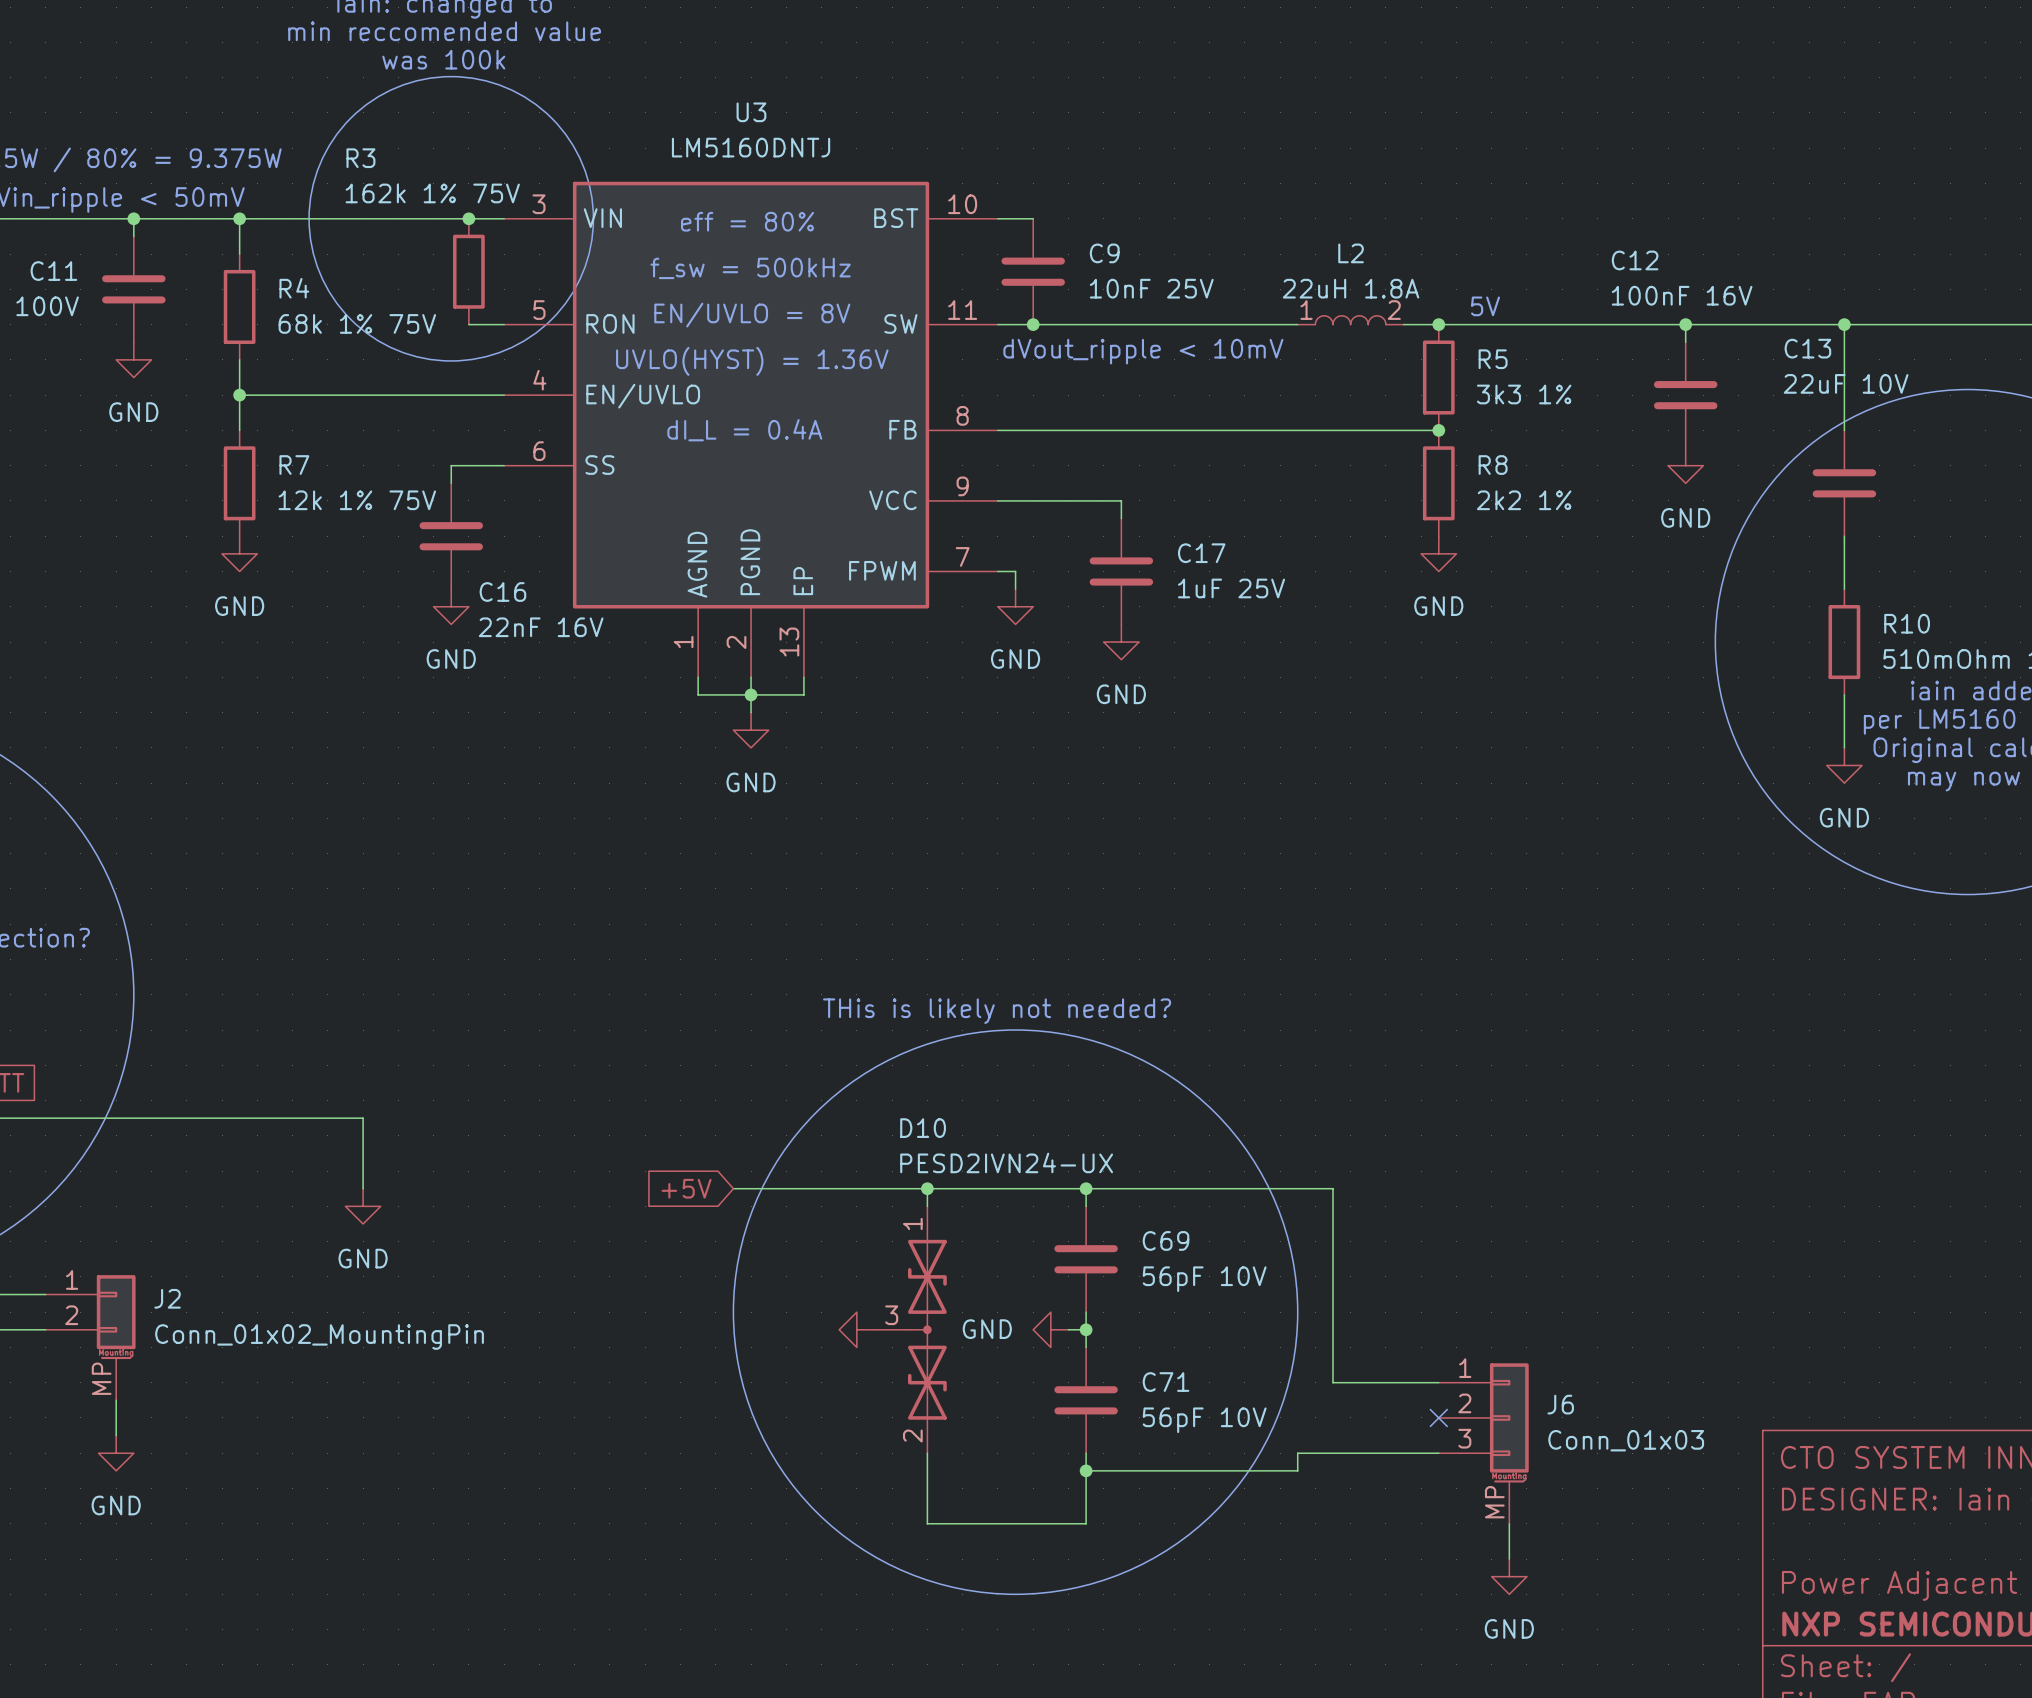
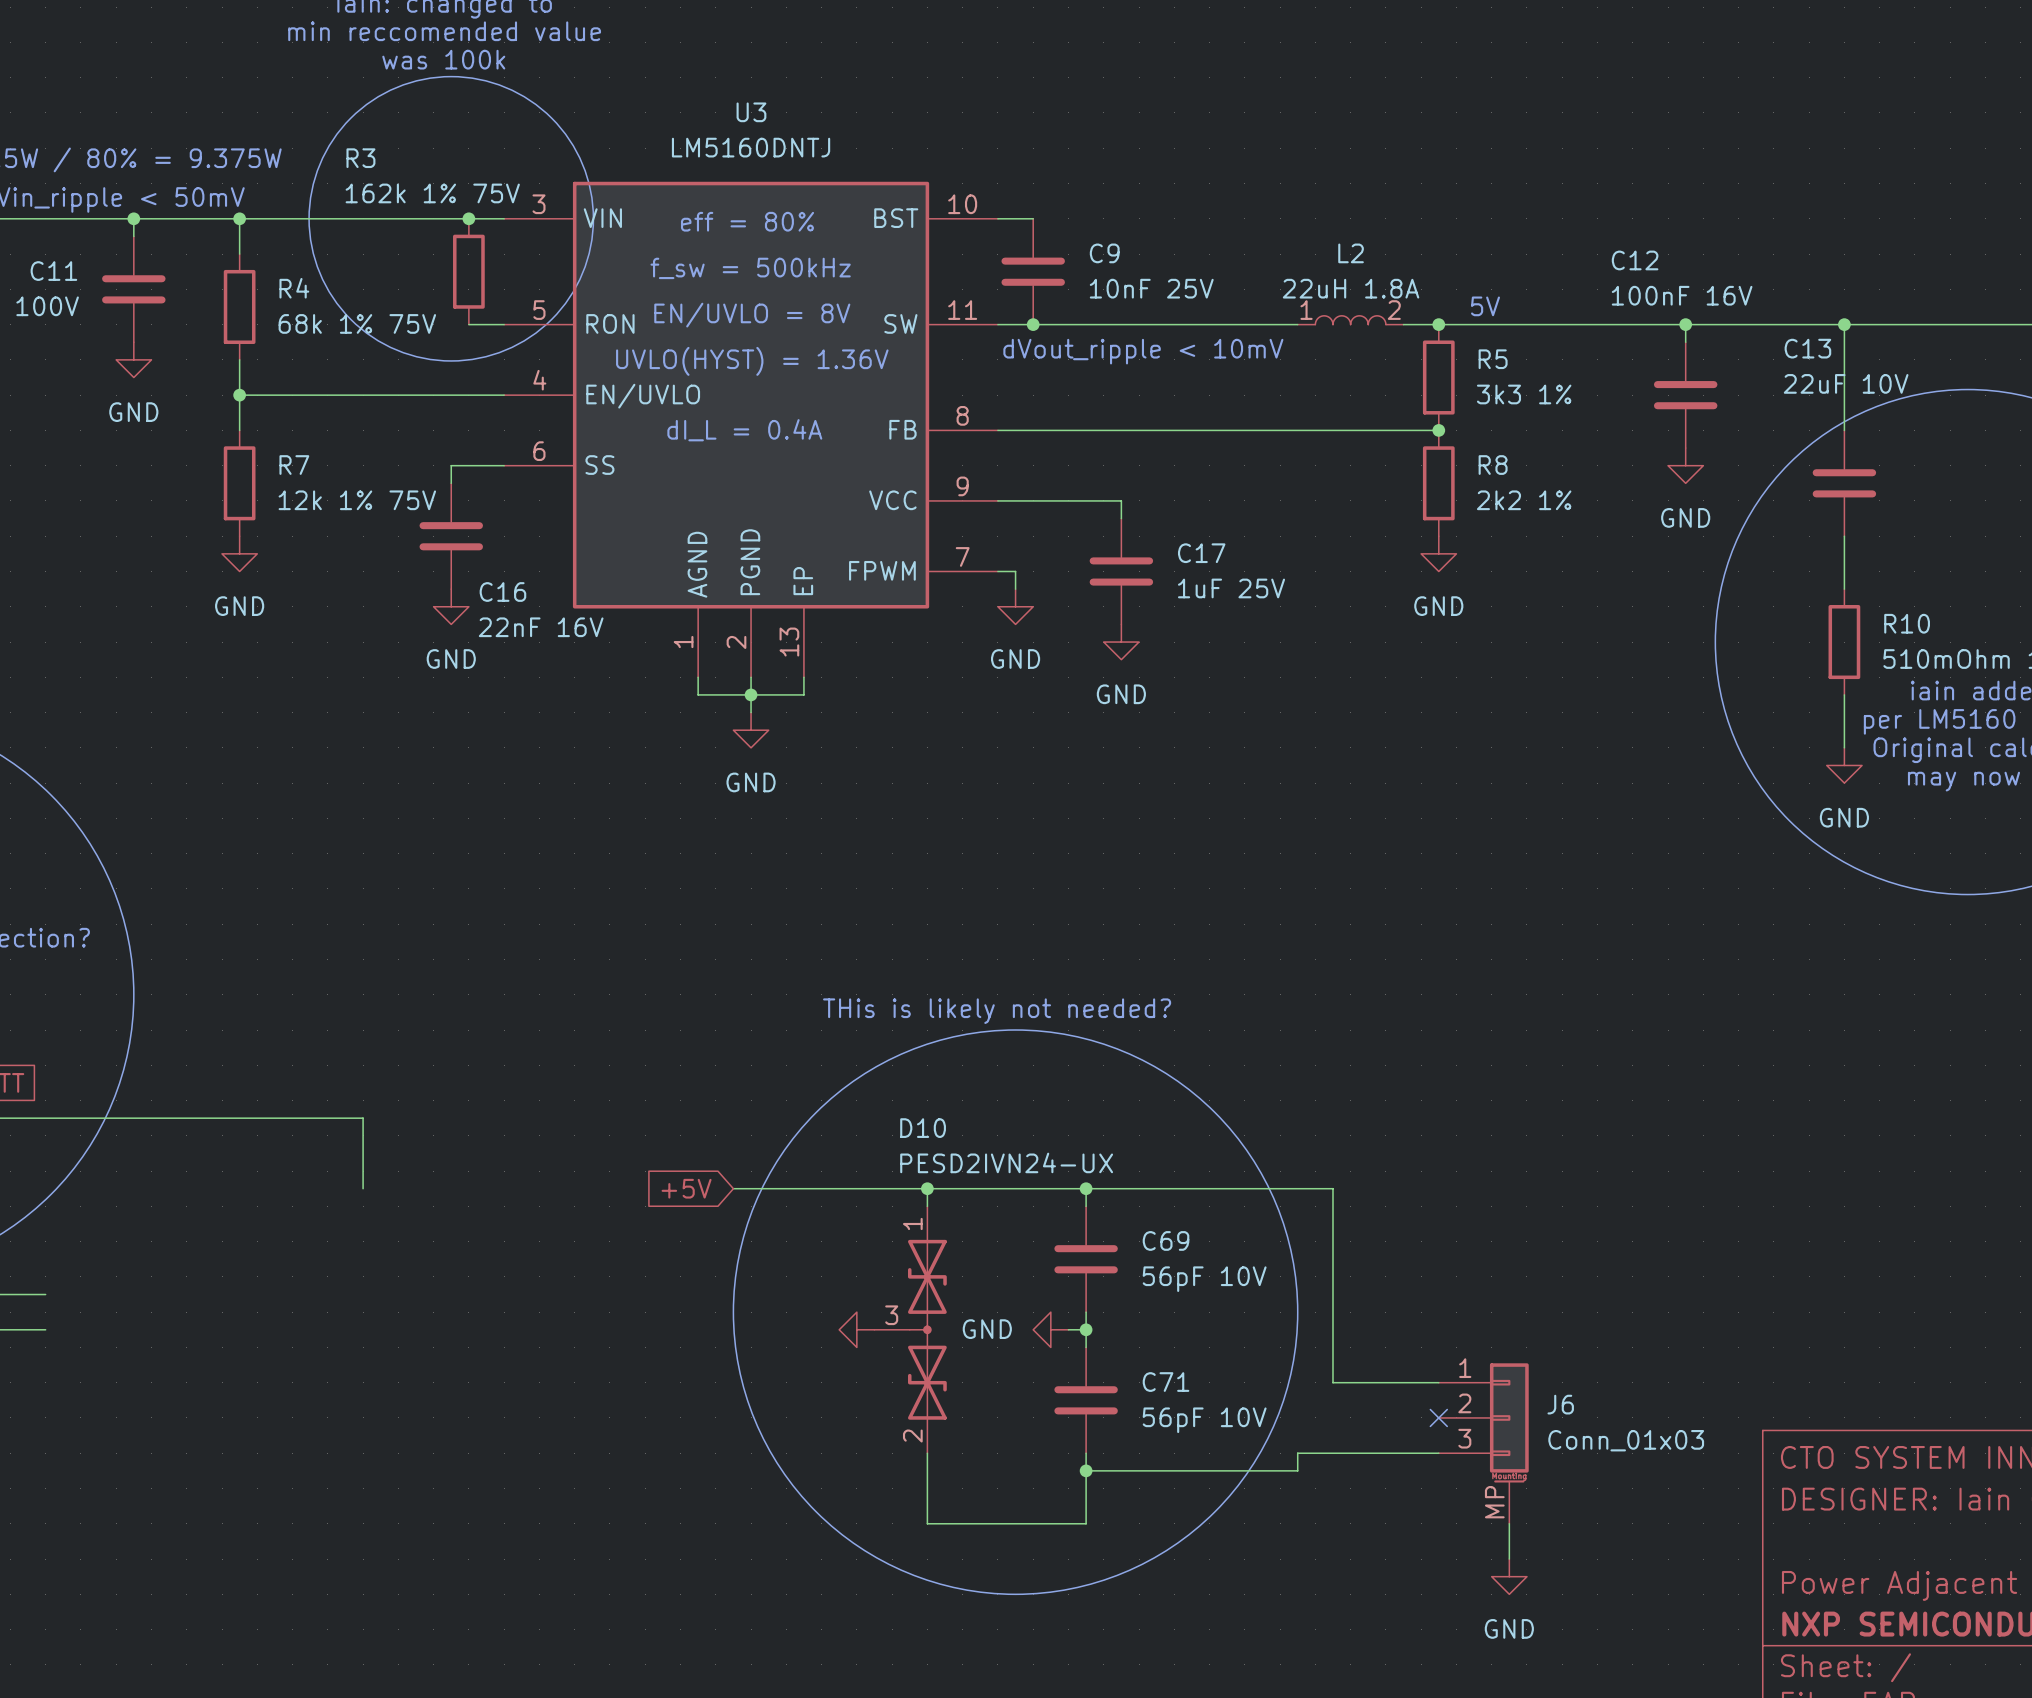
power symbol: GND (363, 1206) -> none
J2: Conn_01x02_MountingPin (90, 1337) -> none
wire: (116, 1400) (116, 1435) -> none
power symbol: GND (116, 1453) -> none

